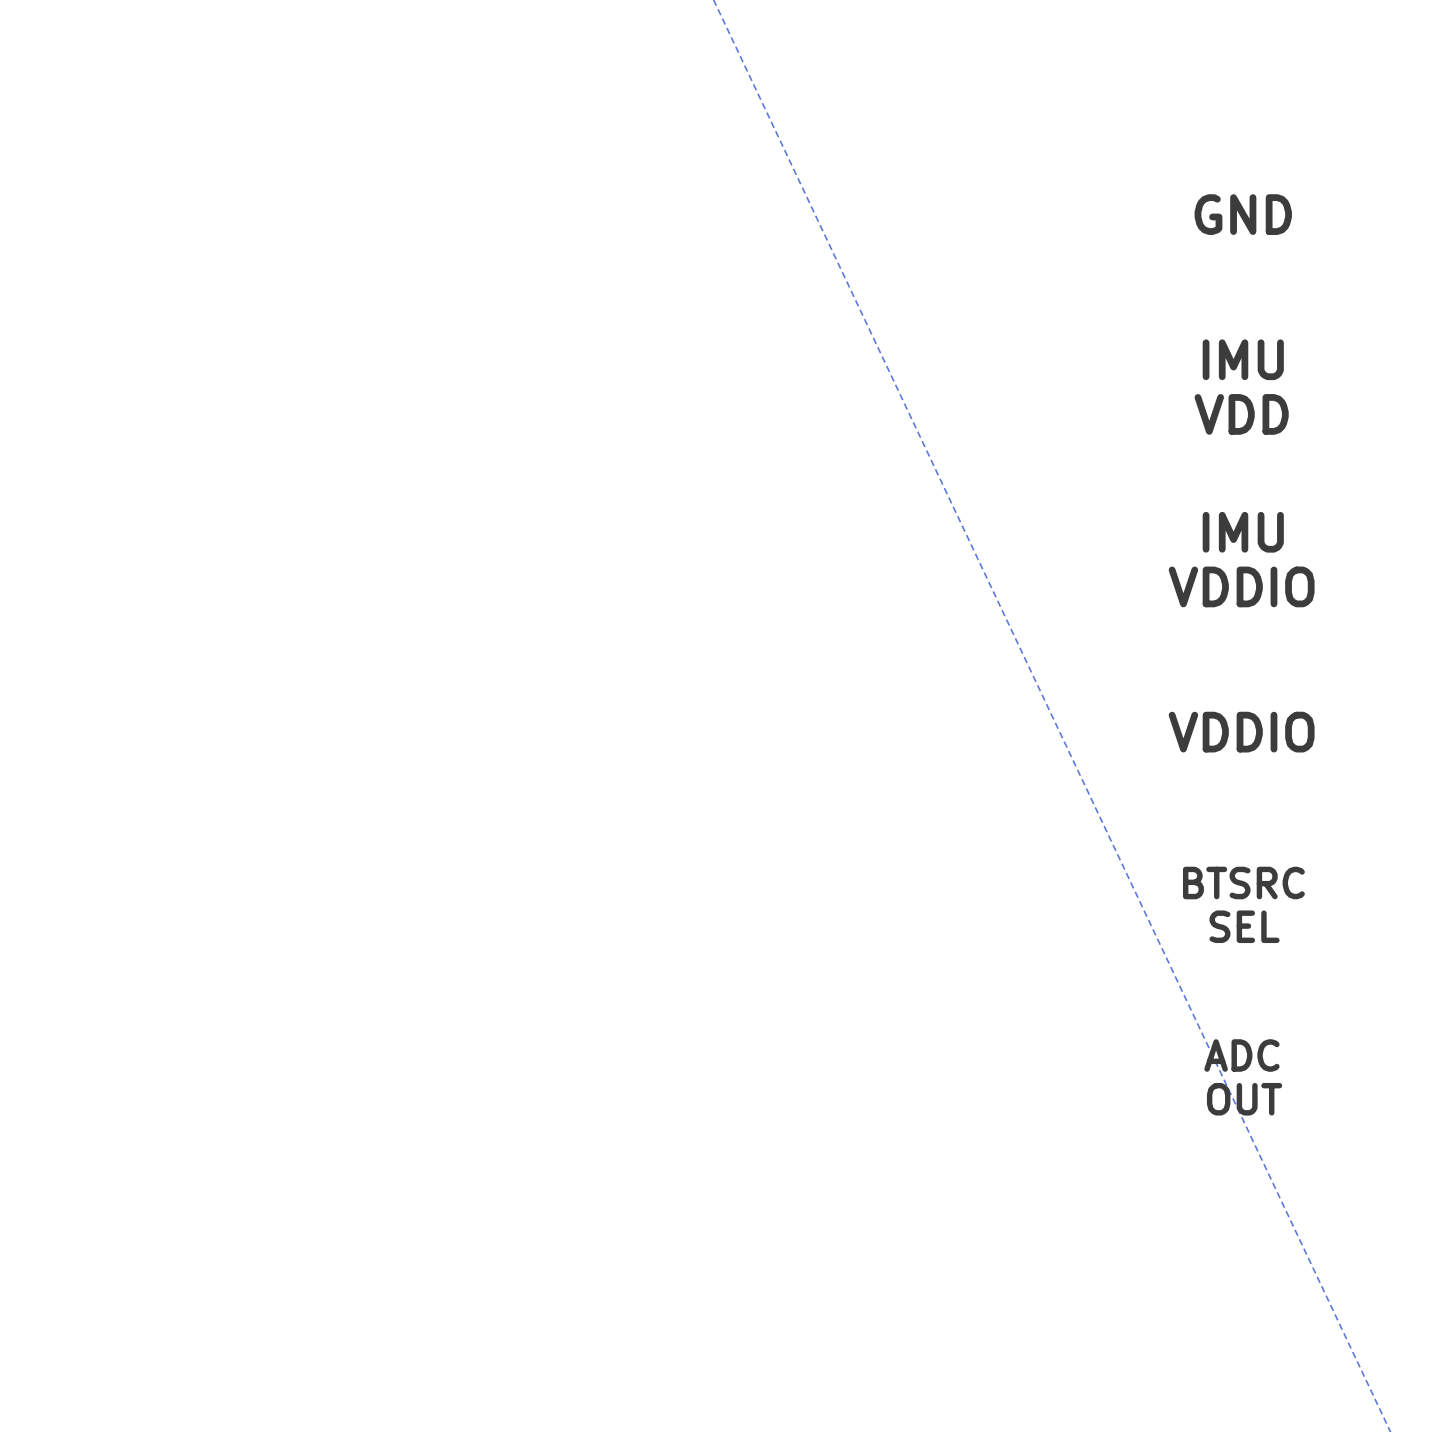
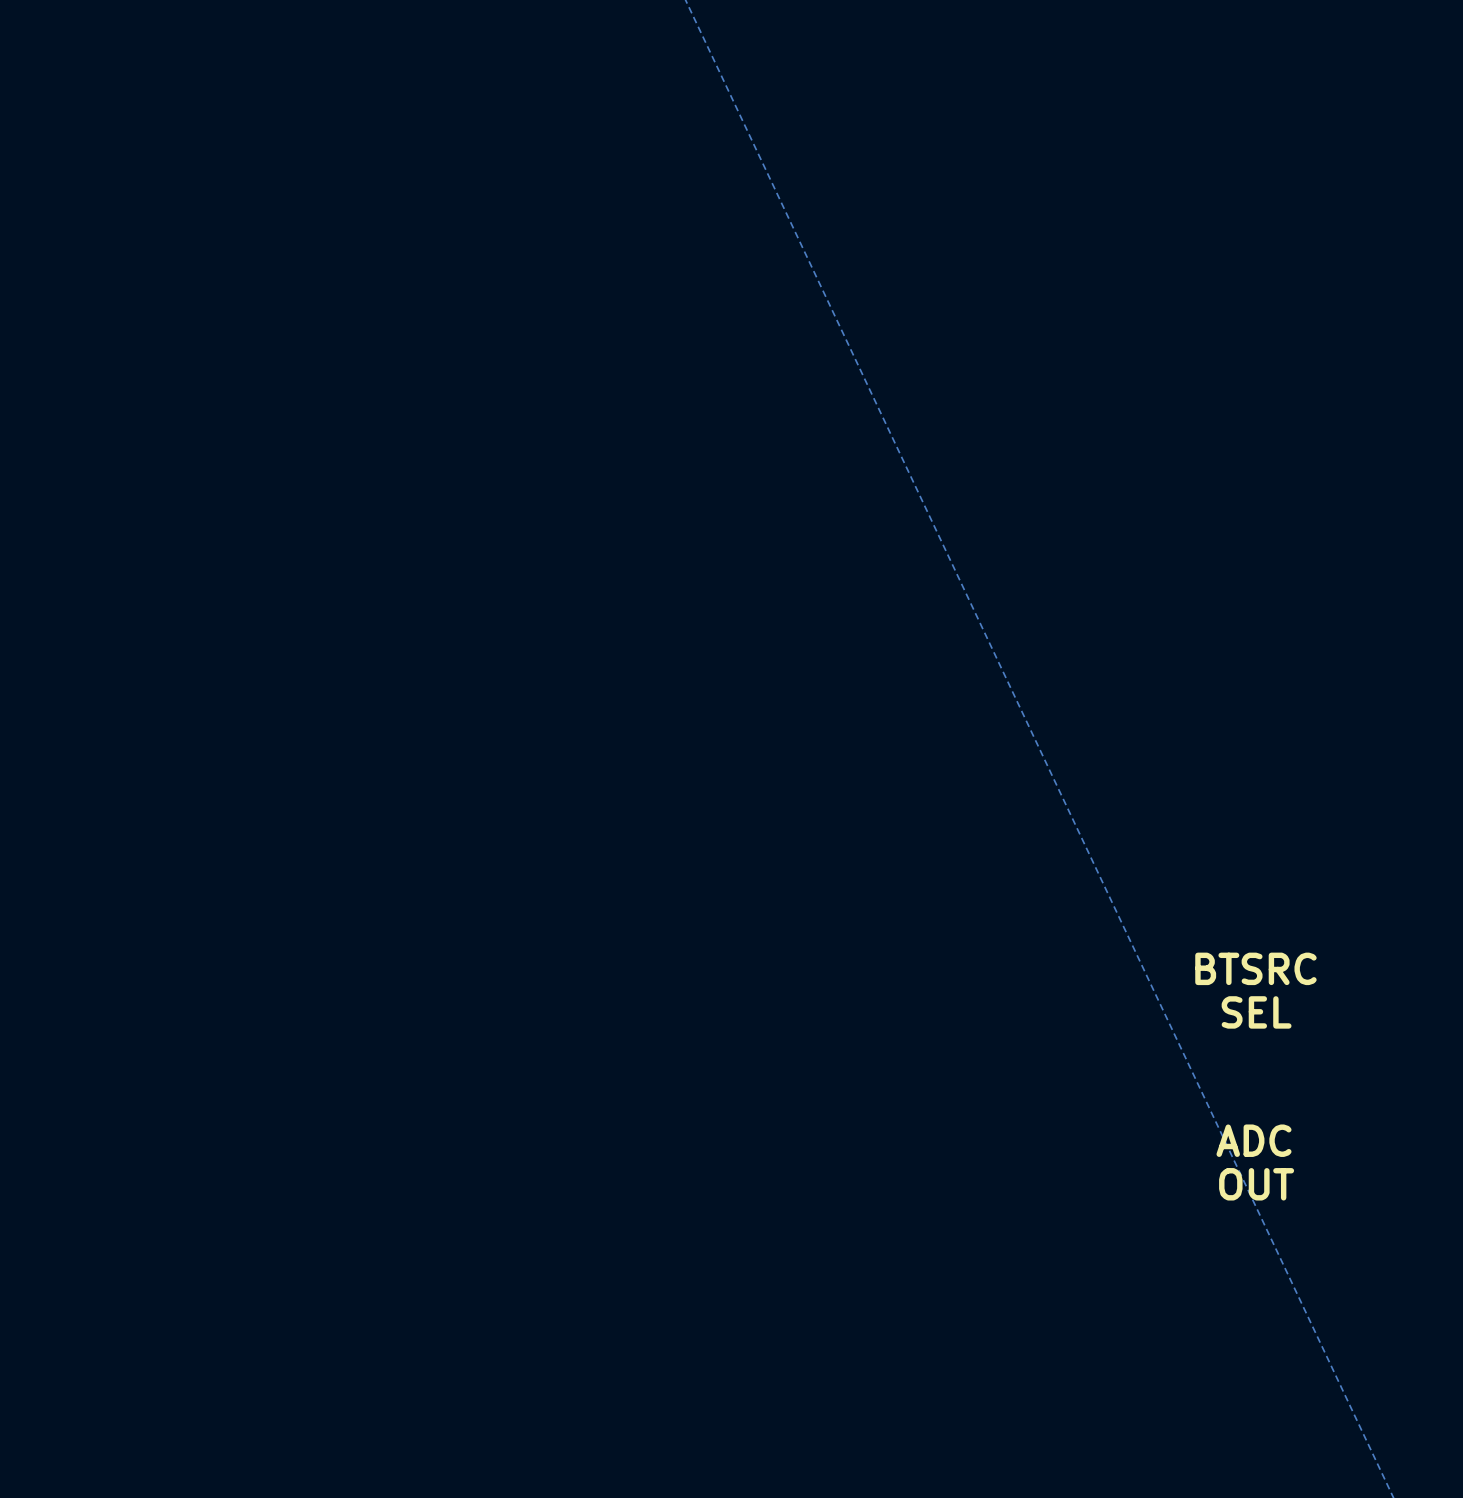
text: GND (1243, 214) -> none
text: IMU (1243, 359) -> none
text: VDD (1241, 414) -> none
text: IMU (1243, 532) -> none
text: VDDIO (1241, 586) -> none
text: VDDIO (1241, 732) -> none

